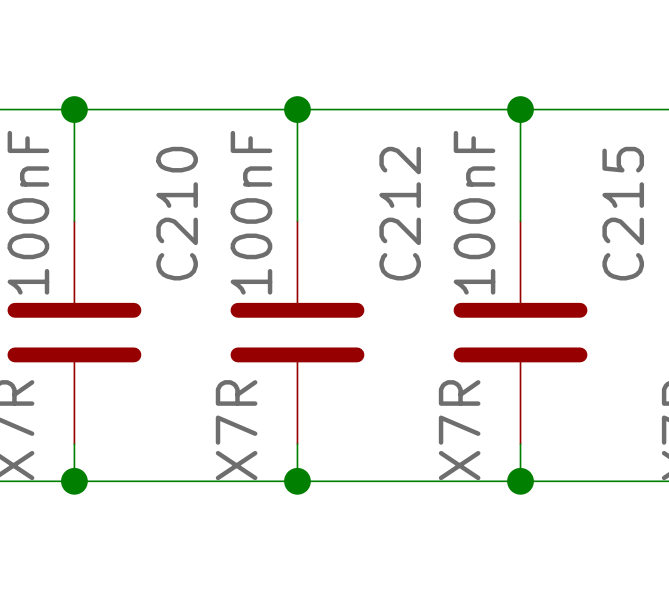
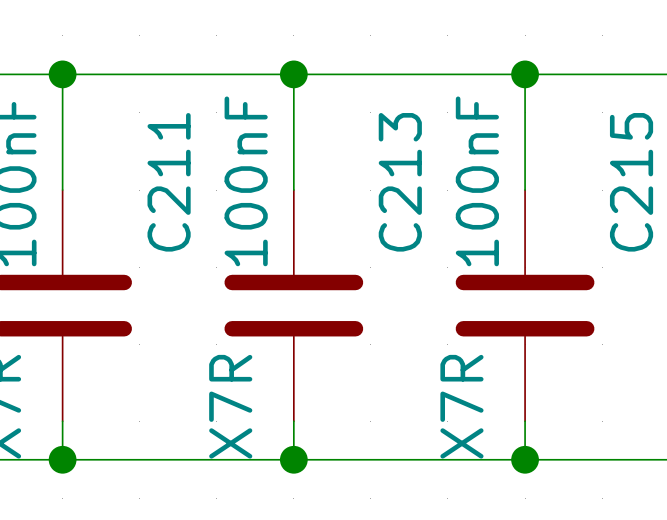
C210 name: C210 (177, 213) -> C211 (169, 182)
C212 name: C212 (400, 213) -> C213 (400, 182)

